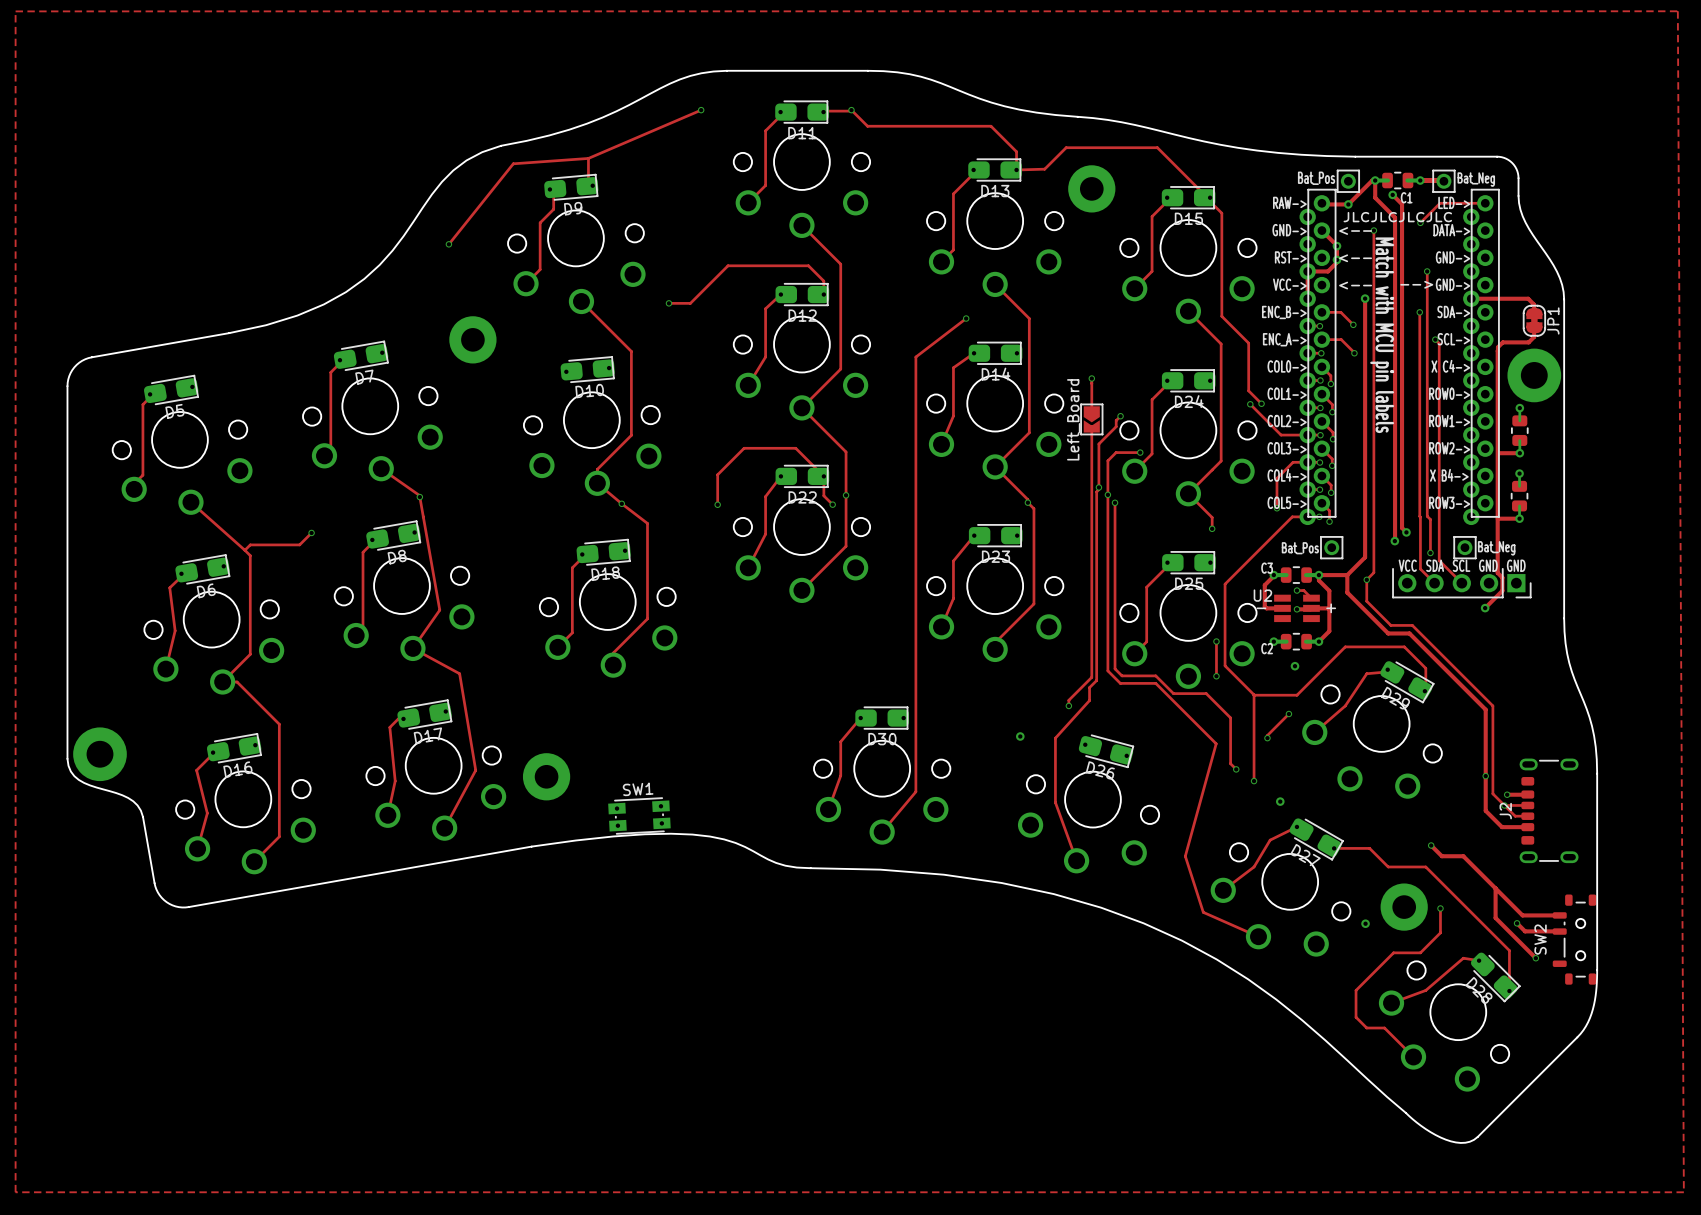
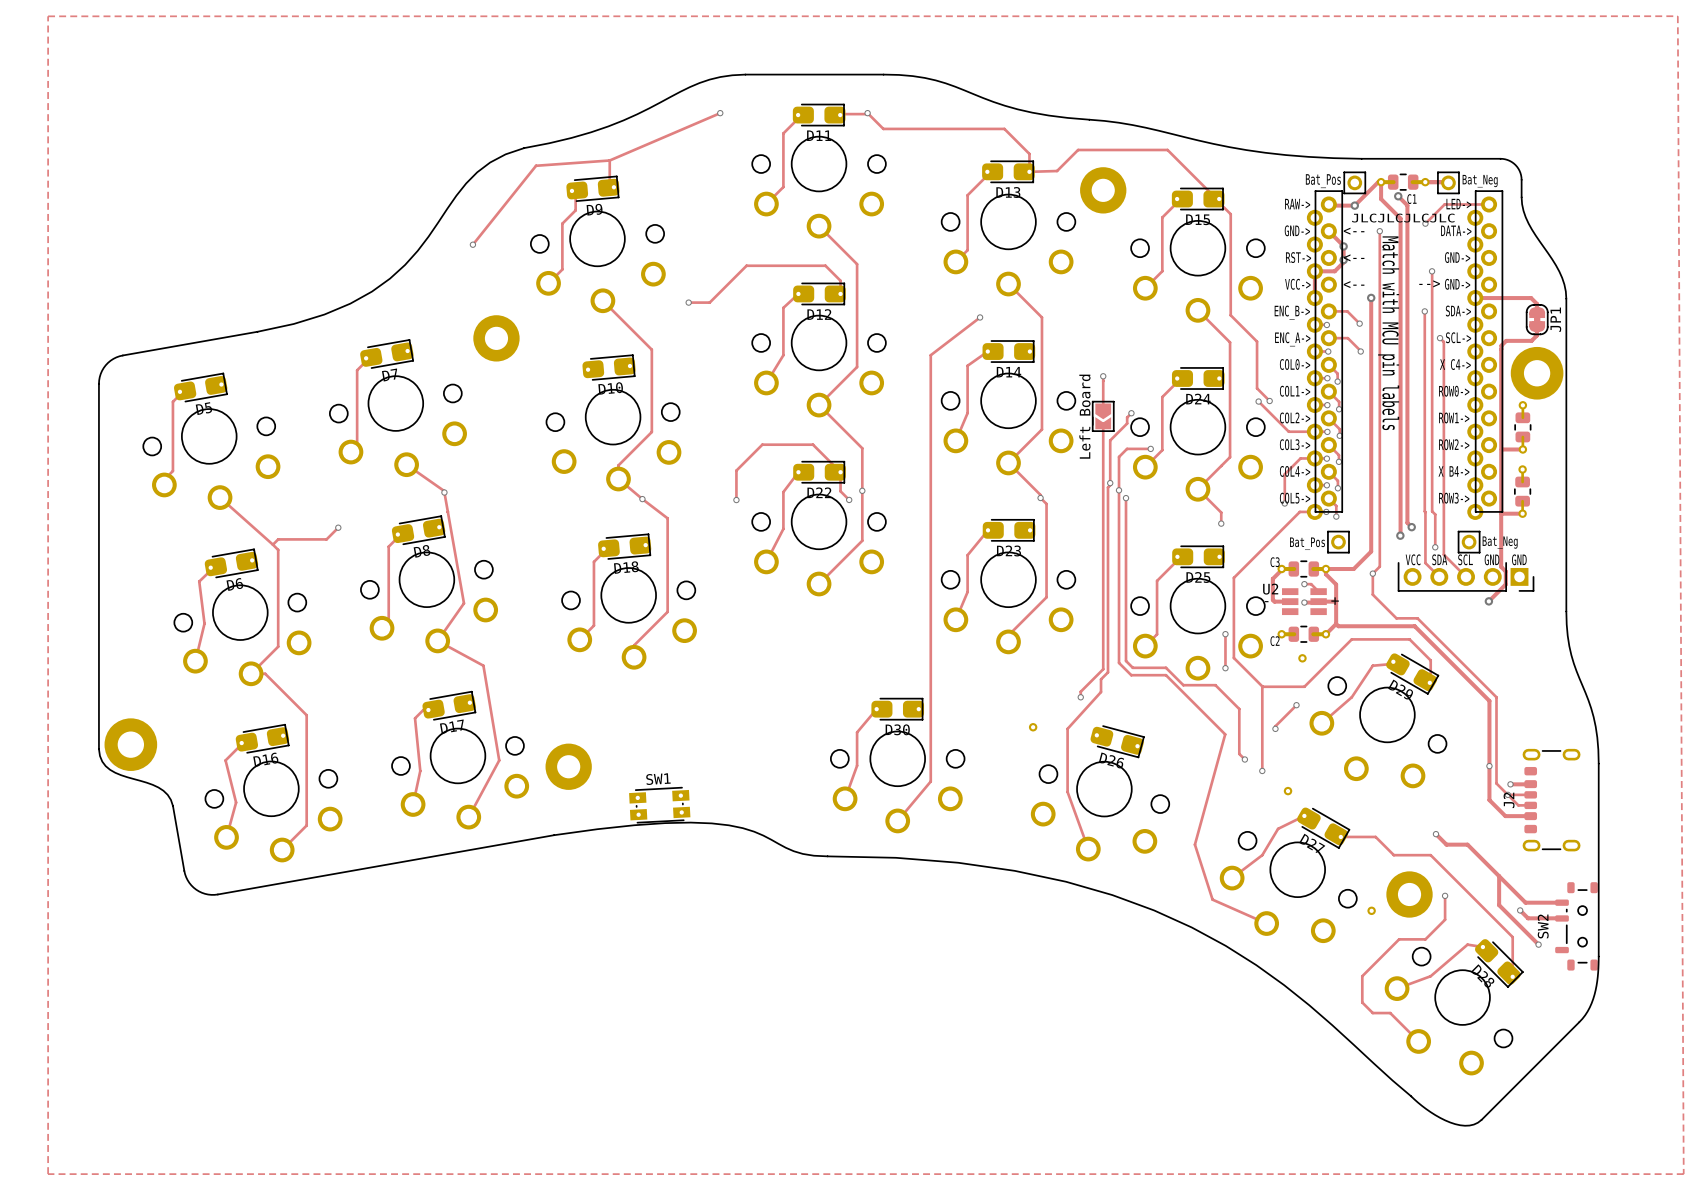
track: (1347, 575) (1347, 592) (1388, 633) -> (1336, 624) (1338, 626) (1393, 626)

